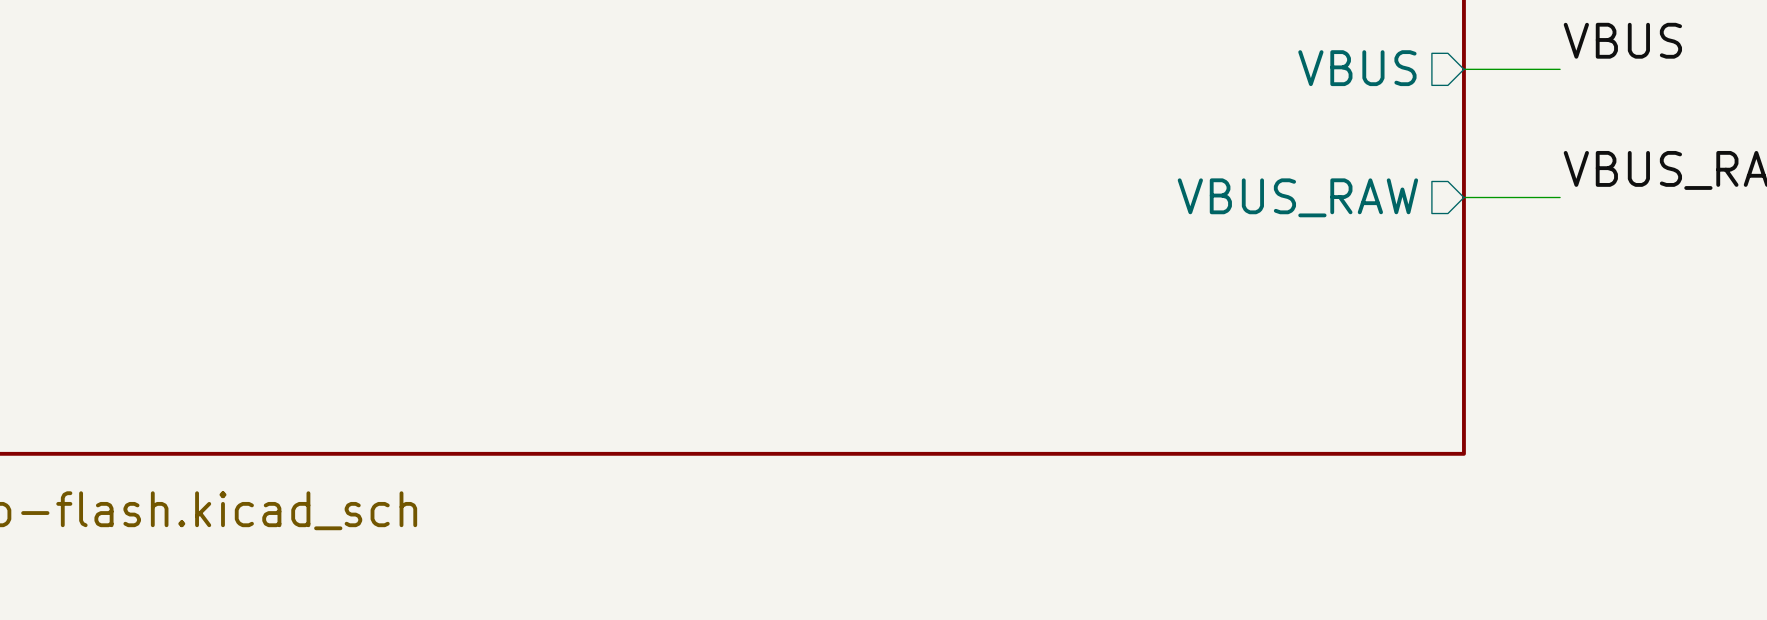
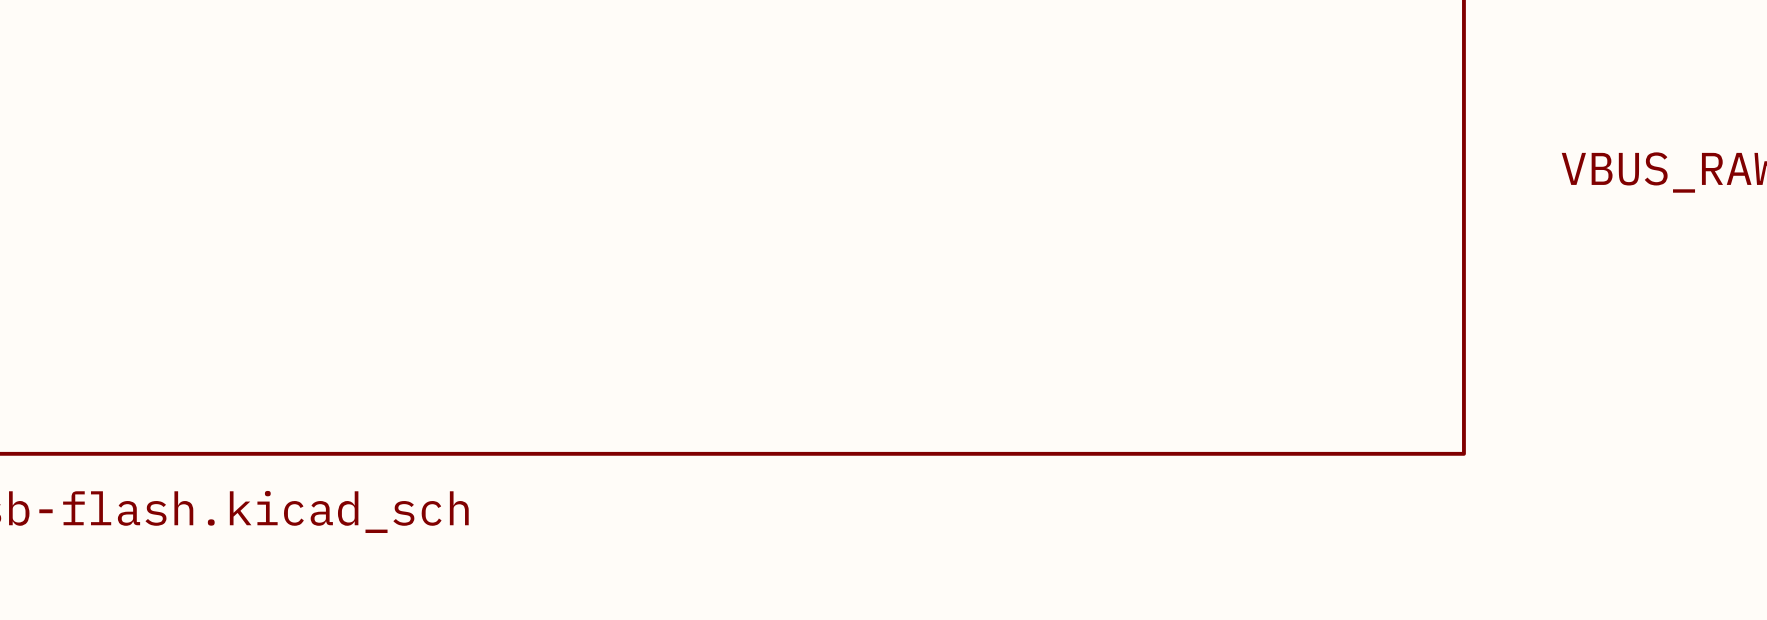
label: VBUS (1622, 40) -> none
sheet pin: VBUS (1357, 68) -> none
wire: (1463, 69) (1560, 69) -> none
sheet pin: VBUS_RAW (1297, 197) -> none
wire: (1463, 197) (1560, 197) -> none

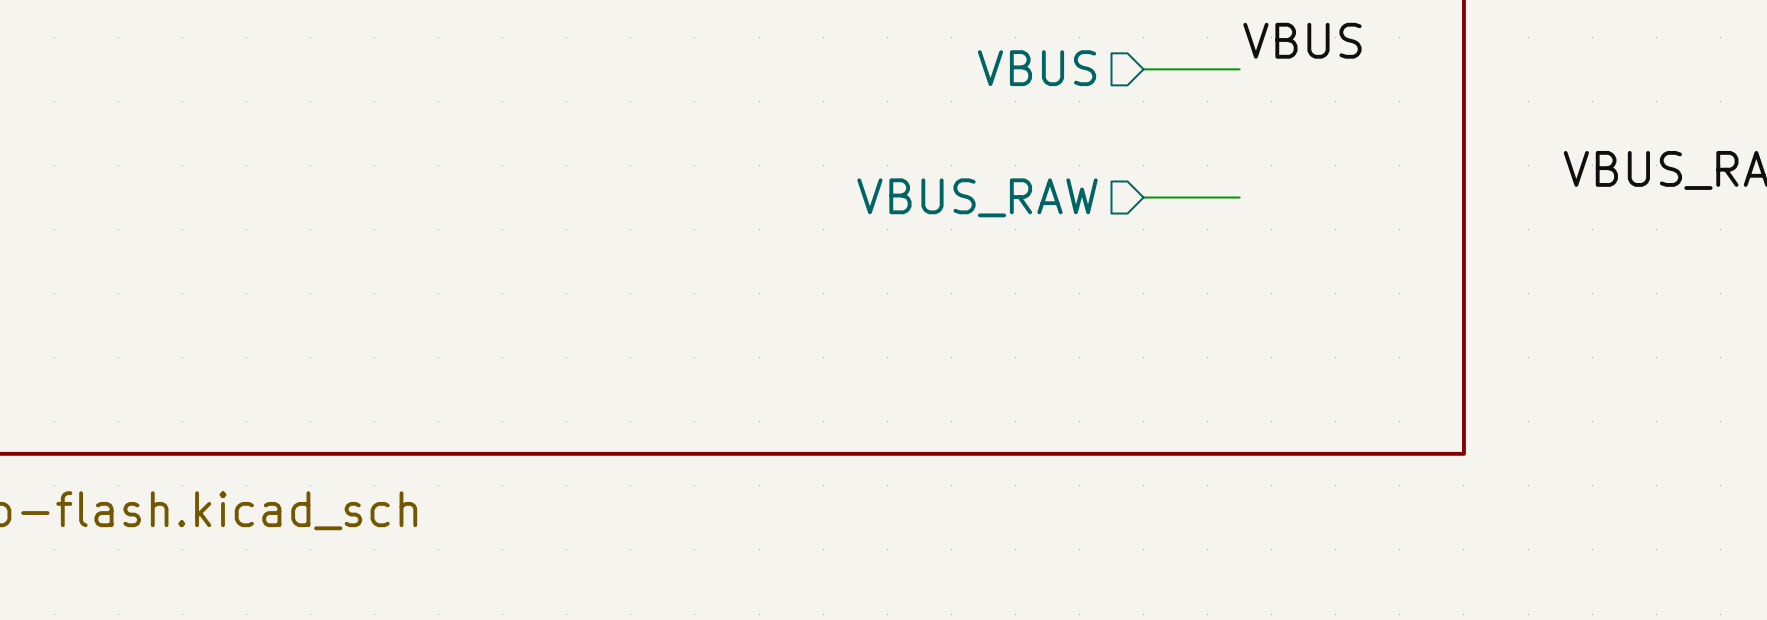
label: none -> VBUS (1302, 40)
sheet pin: none -> VBUS (1037, 68)
wire: none -> (1143, 69) (1239, 69)
wire: none -> (1143, 197) (1239, 197)
sheet pin: none -> VBUS_RAW (977, 197)

